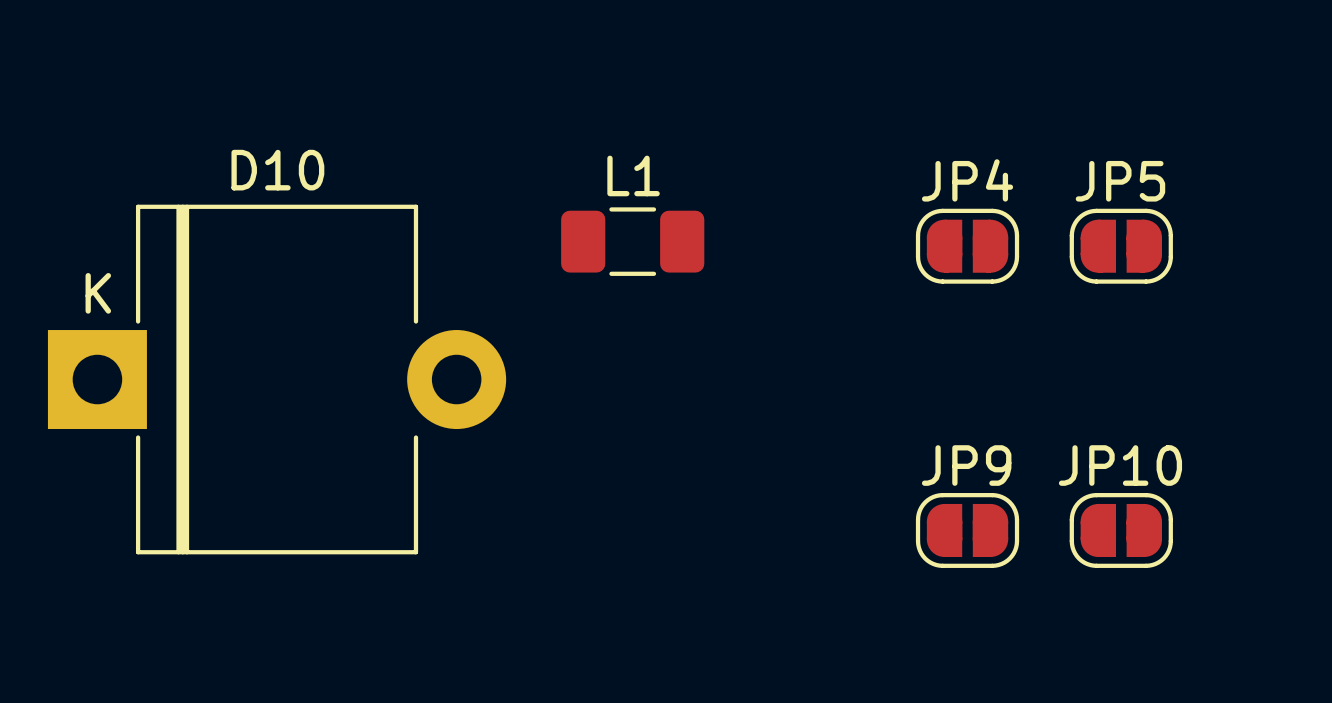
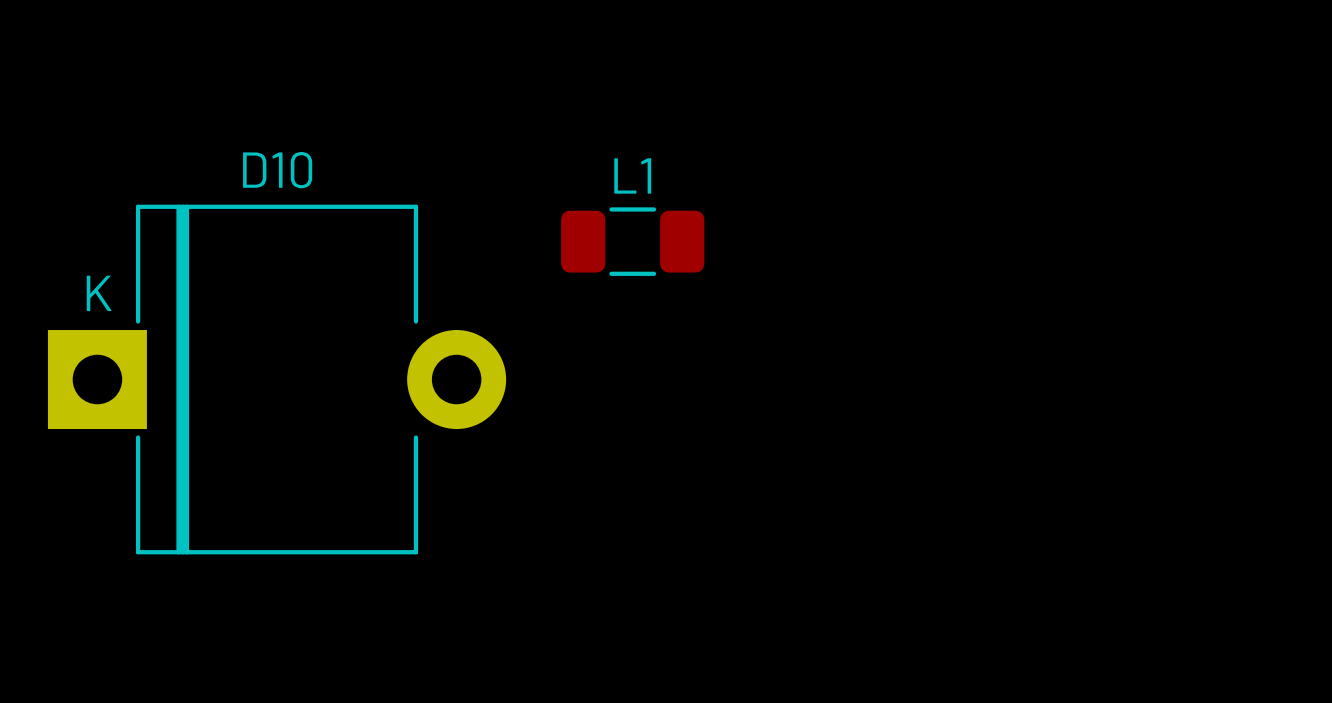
JP4: (967, 246) -> none
JP5: (1121, 246) -> none
JP9: (967, 530) -> none
JP10: (1121, 530) -> none

